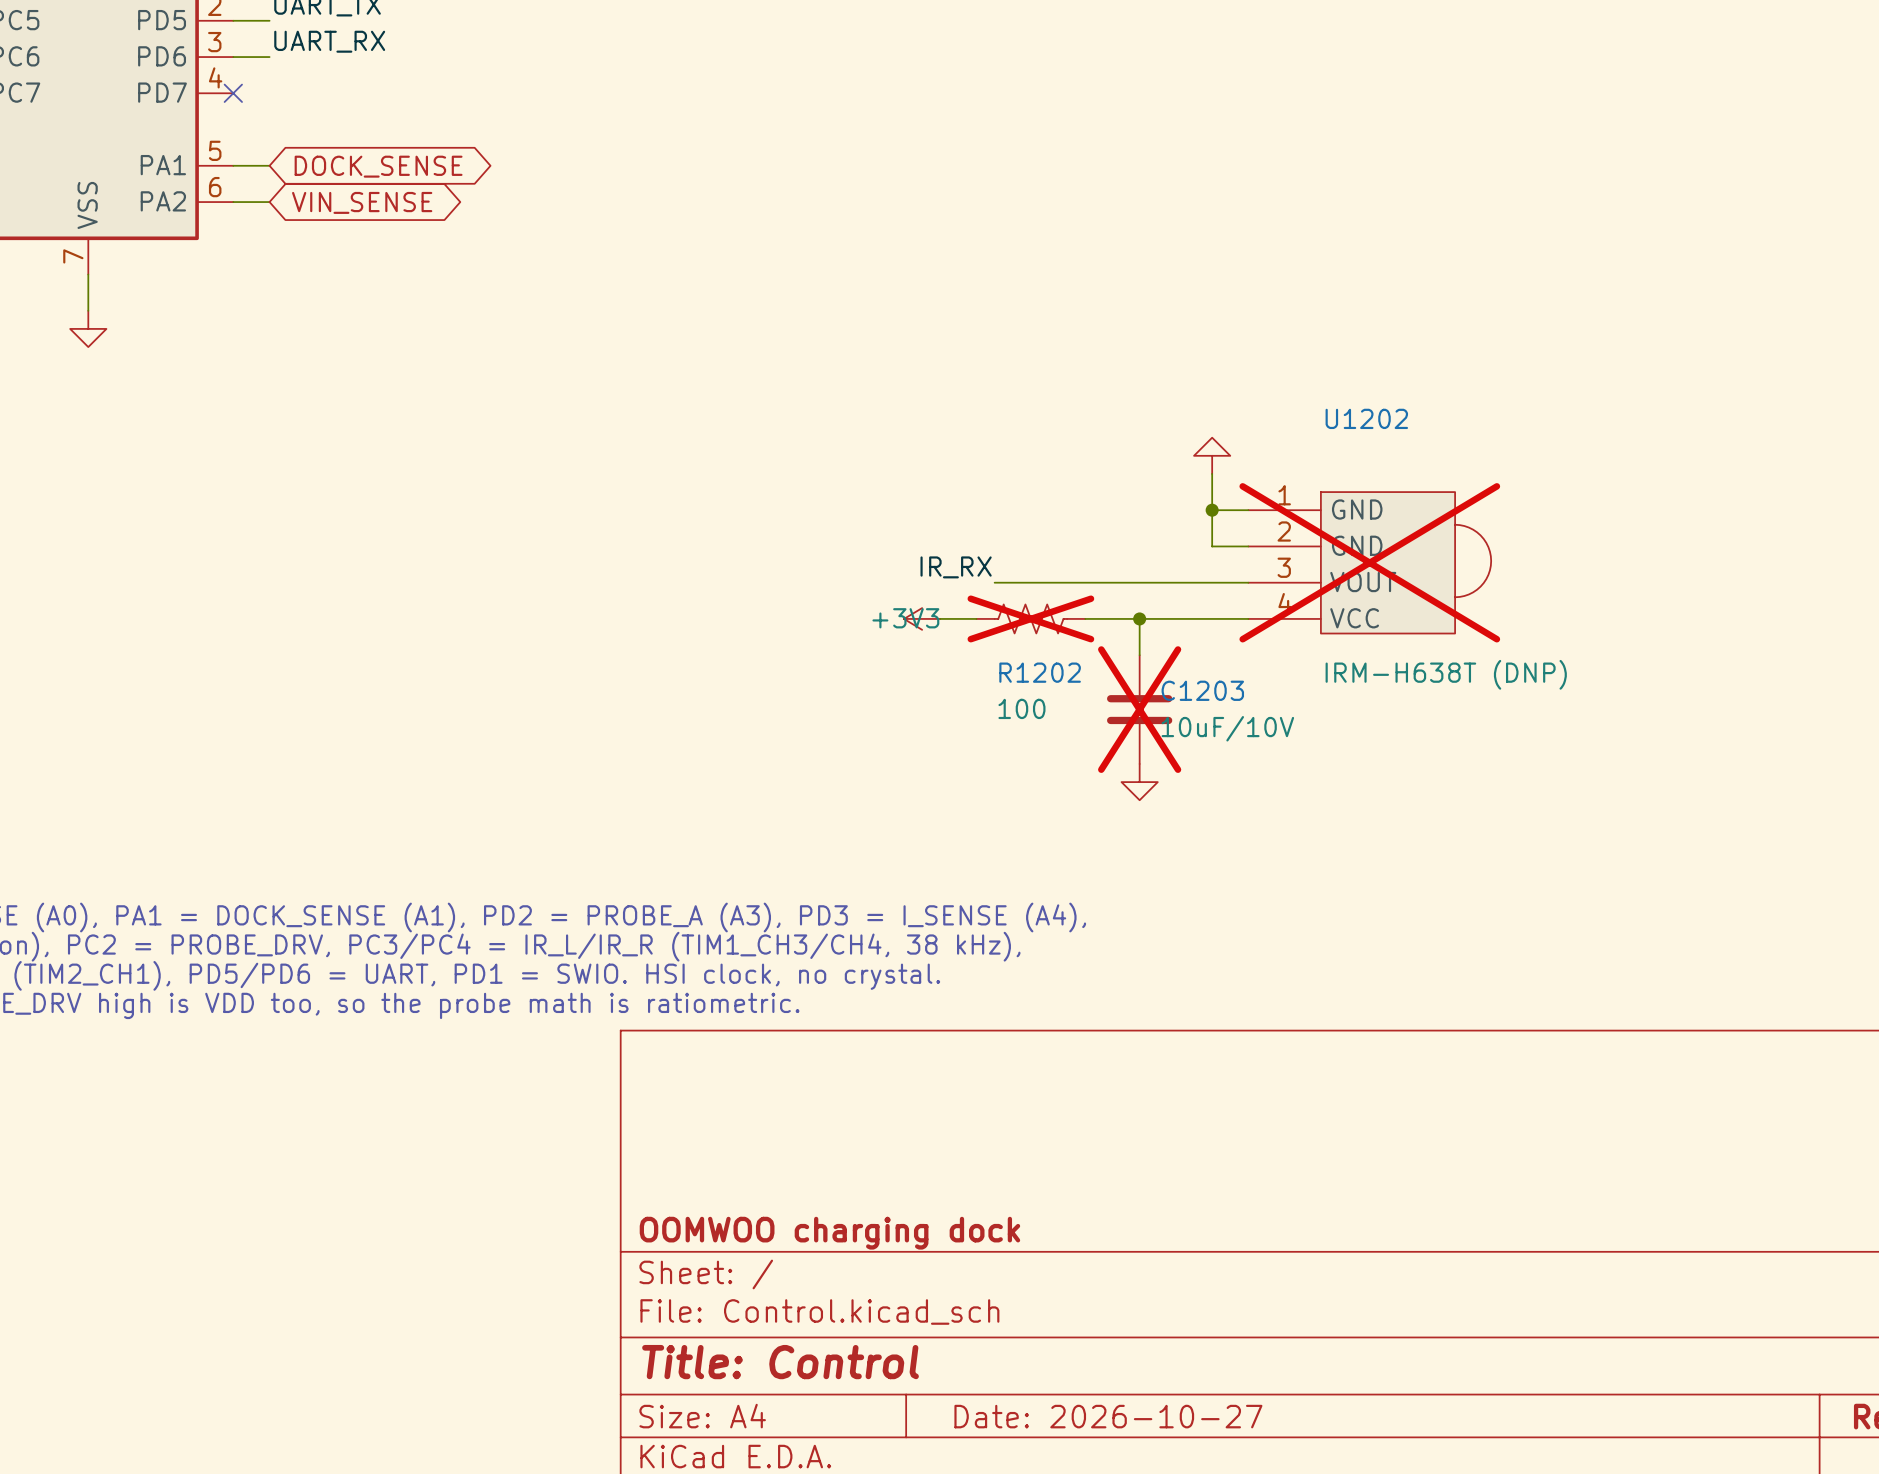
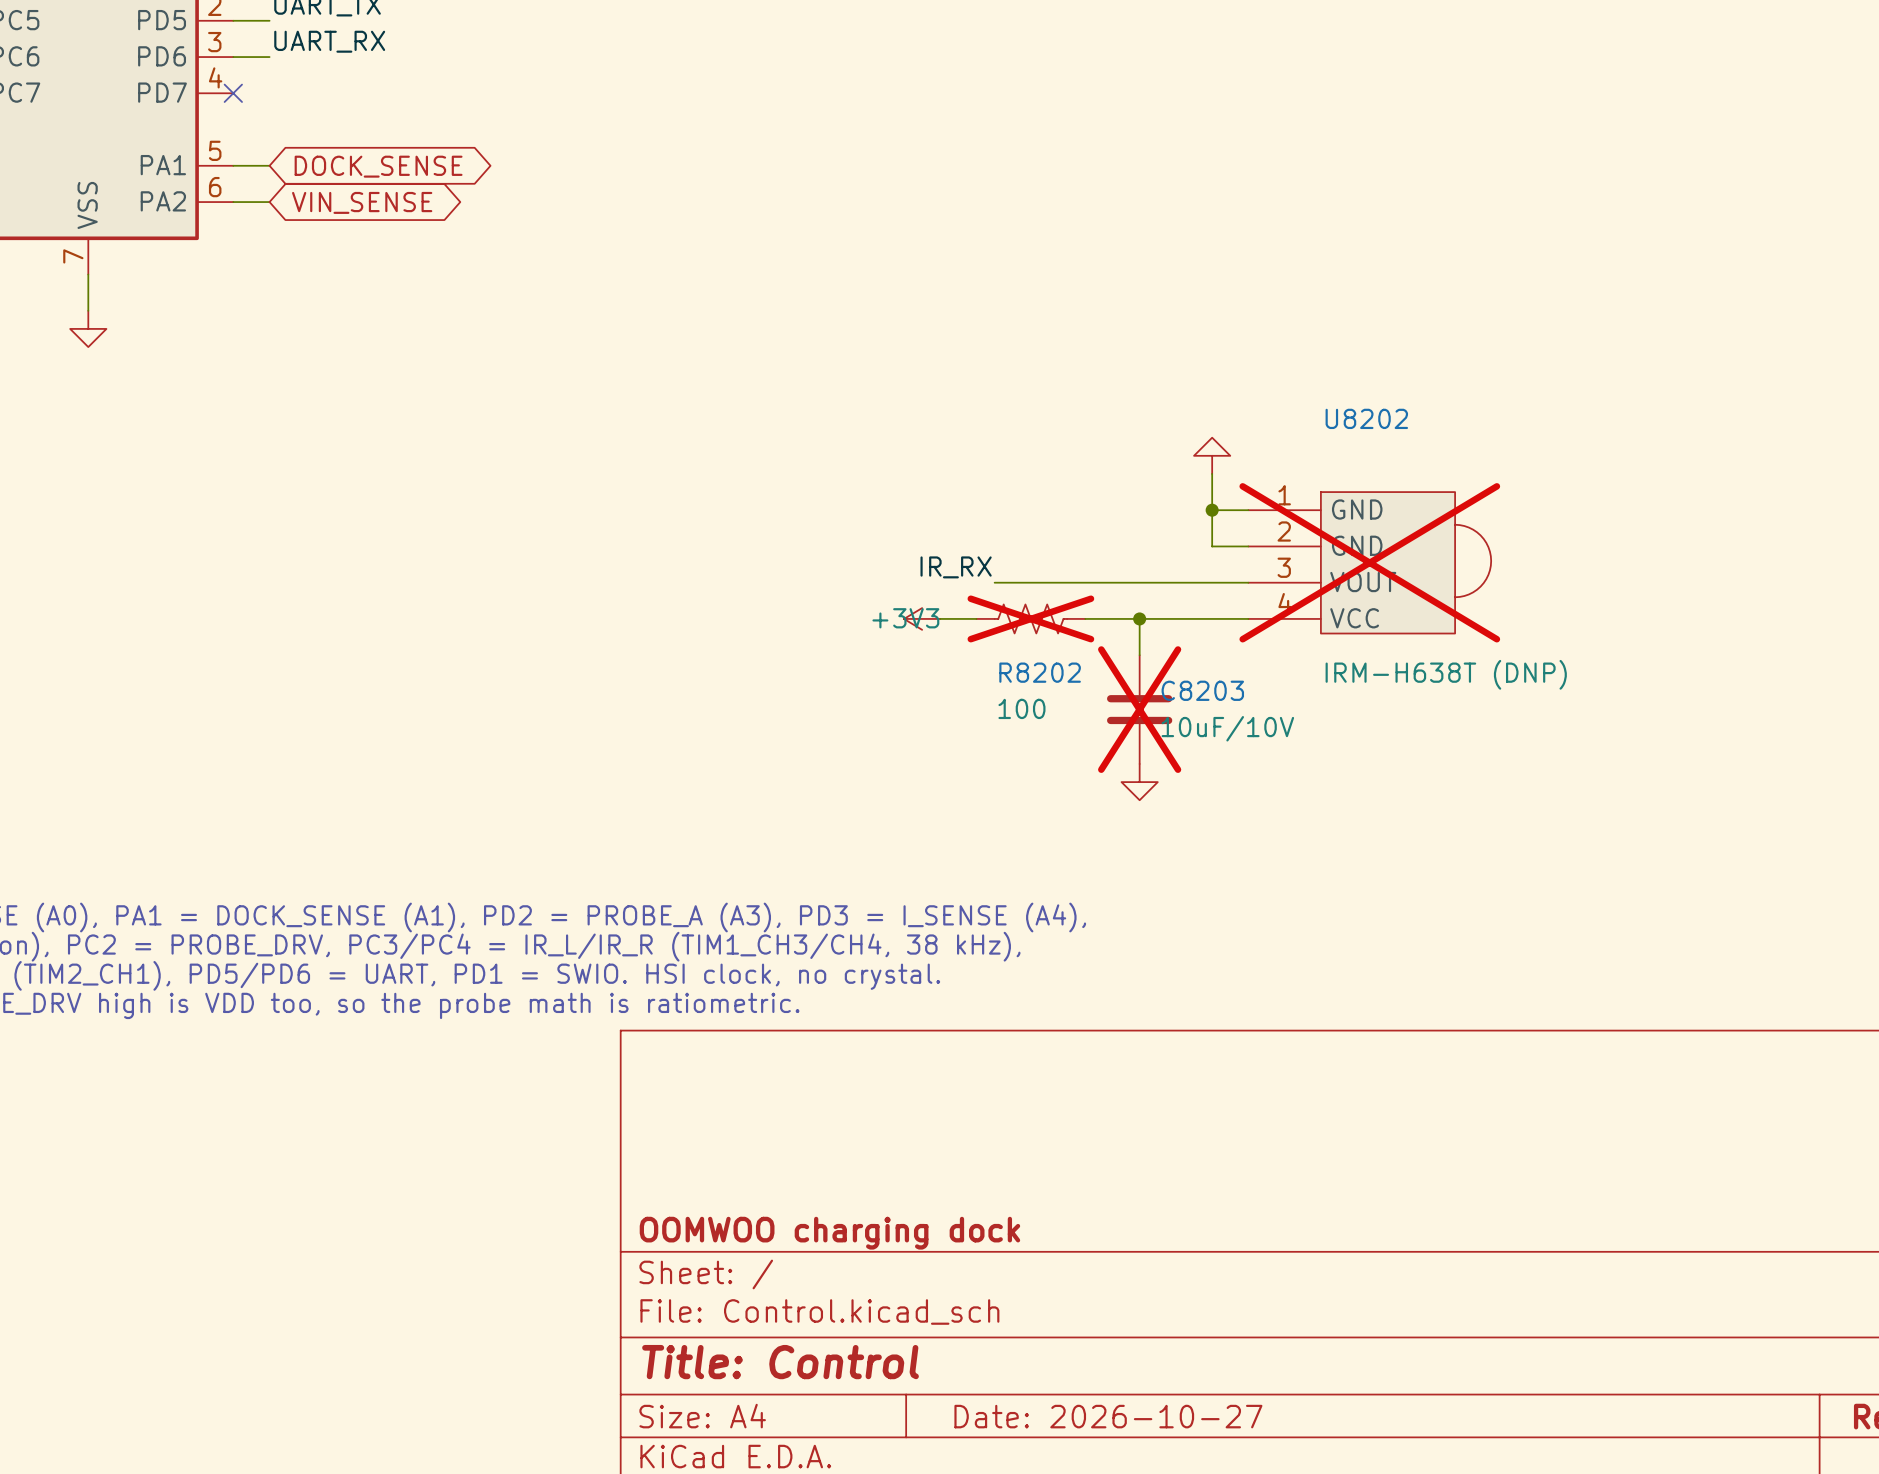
U1202 name: U1202 (1366, 418) -> U8202 (1366, 418)
R1202 name: R1202 (1040, 672) -> R8202 (1040, 672)
C1203 name: C1203 (1202, 690) -> C8203 (1202, 690)

